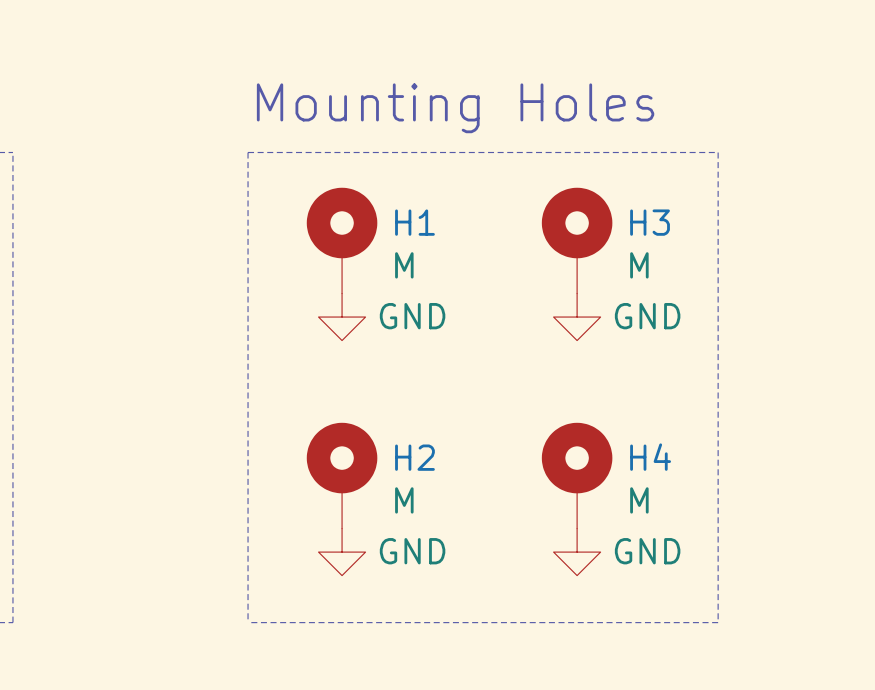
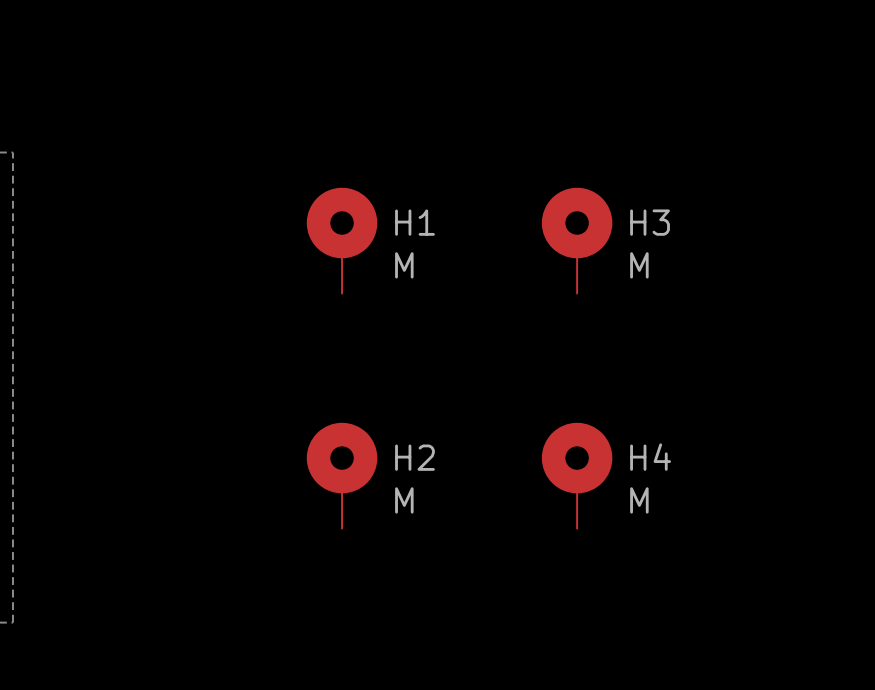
text: Mounting Holes (455, 108) -> none
line: (248, 152) (718, 152) (718, 622) (248, 622) (248, 152) -> none
power symbol: GND (342, 317) -> none
power symbol: GND (577, 317) -> none
power symbol: GND (342, 552) -> none
power symbol: GND (577, 552) -> none

